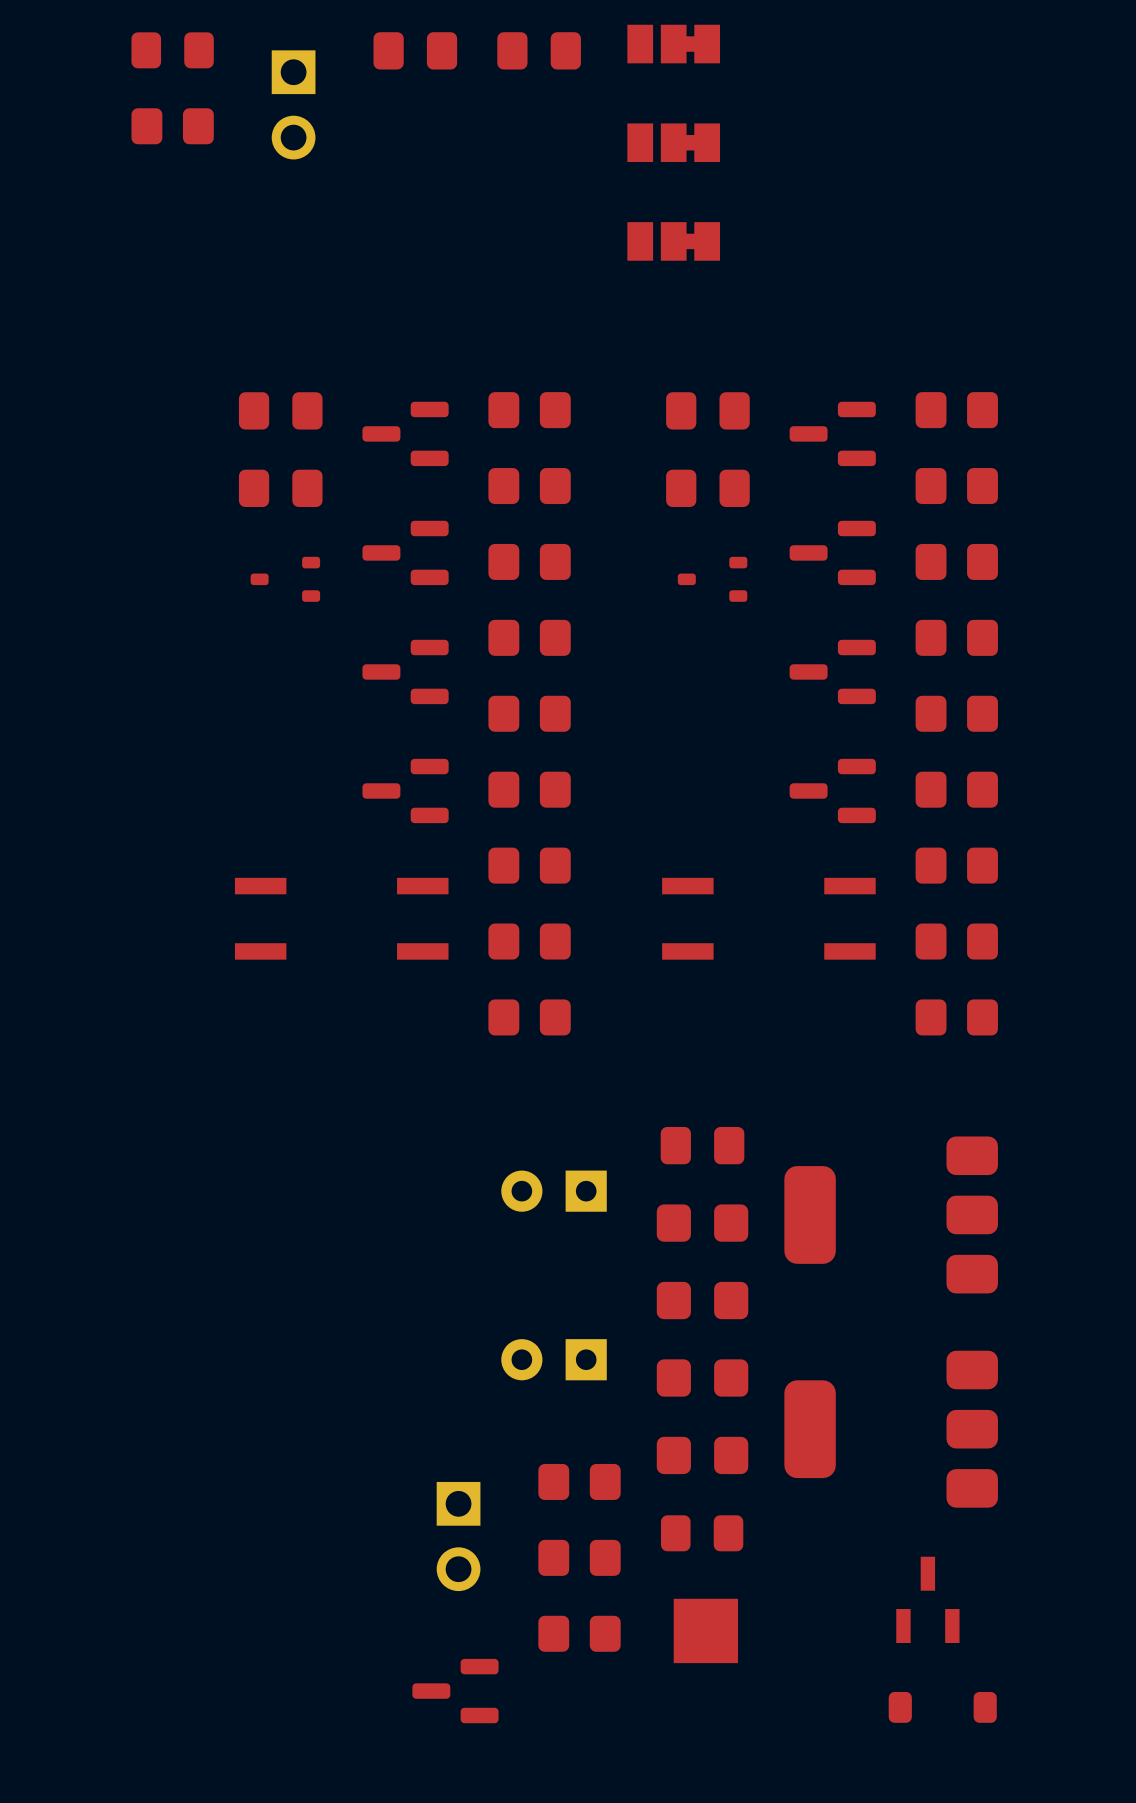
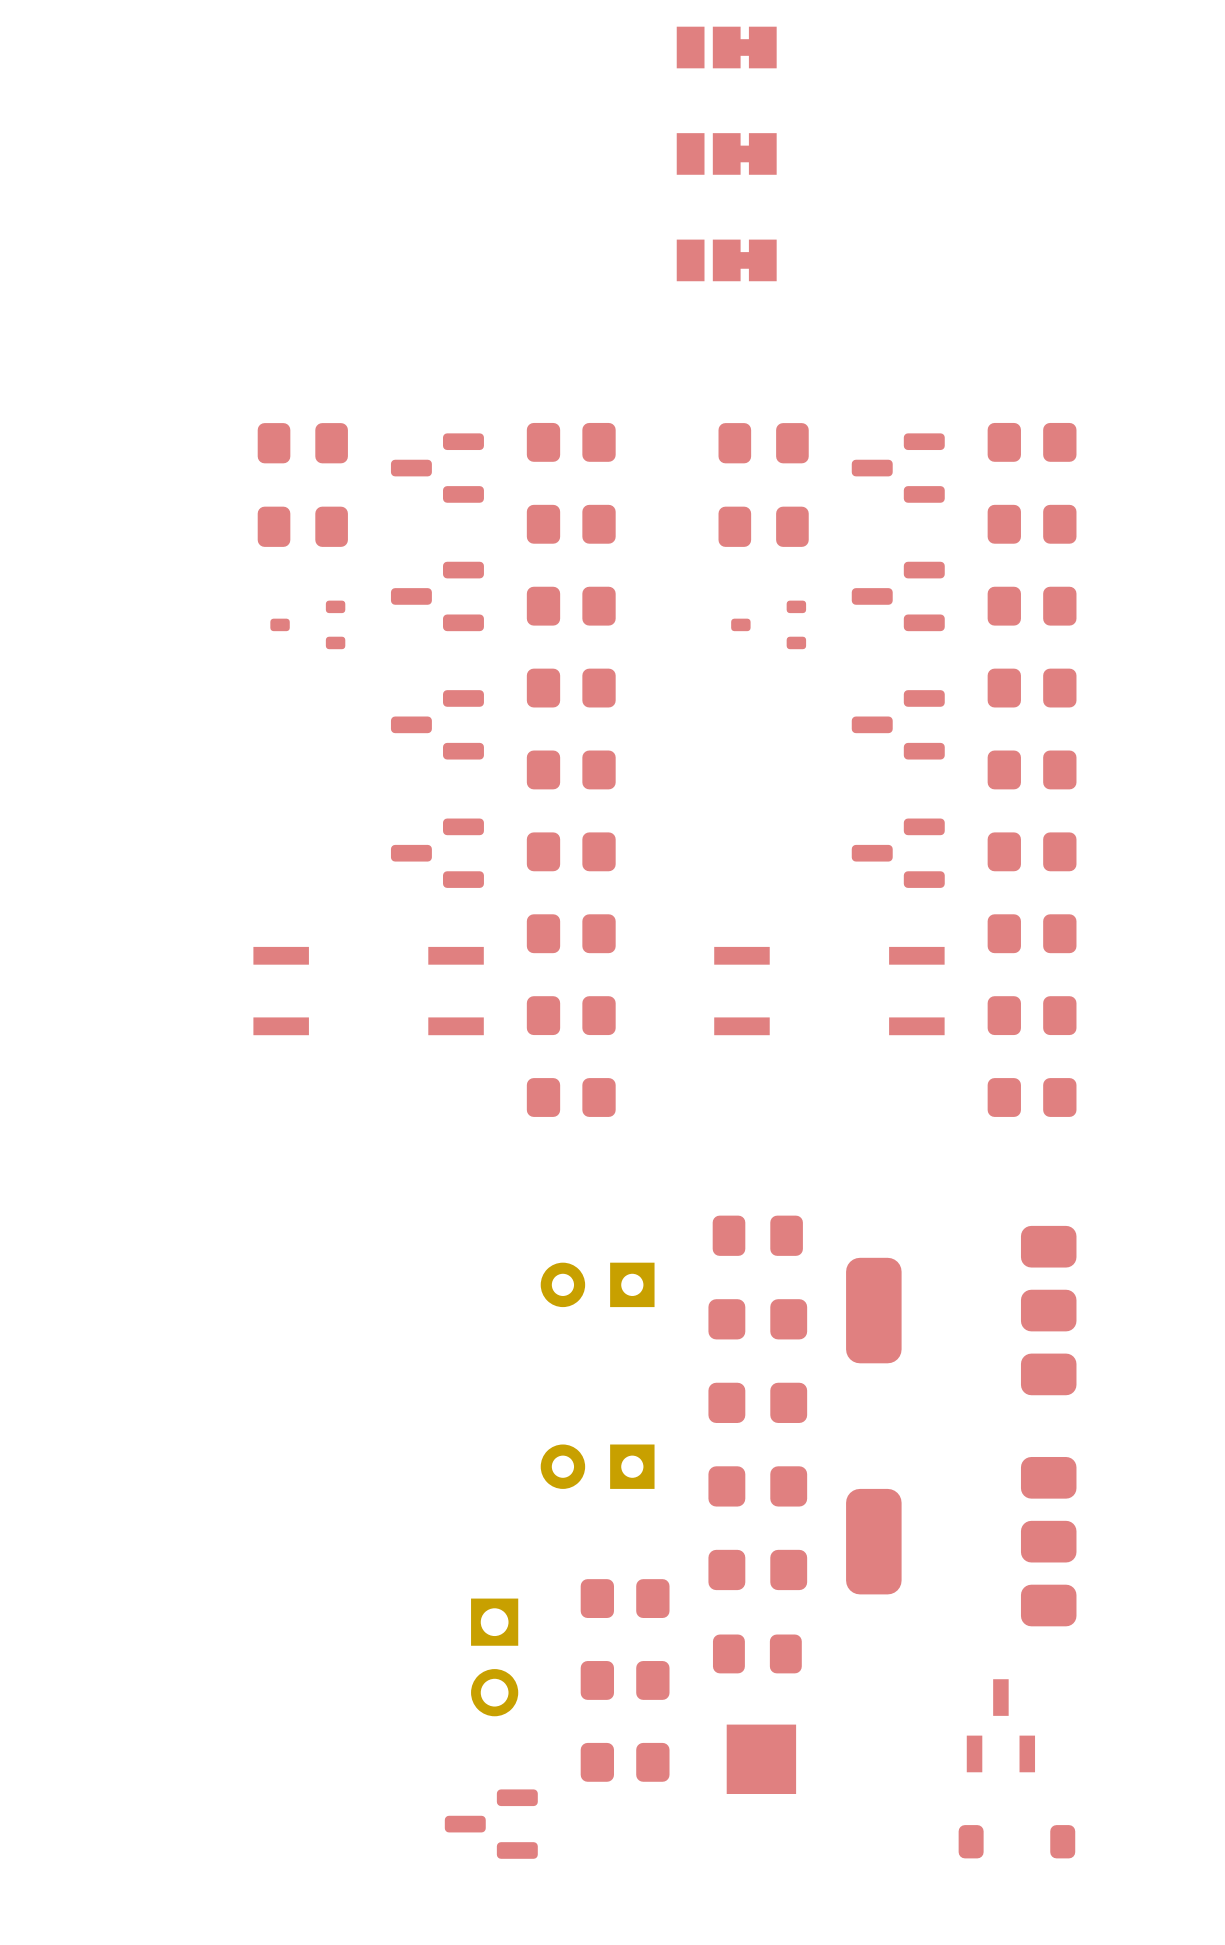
part: (172, 50) -> none
part: (415, 50) -> none
part: (539, 50) -> none
part: (293, 104) -> none
part: (172, 126) -> none

